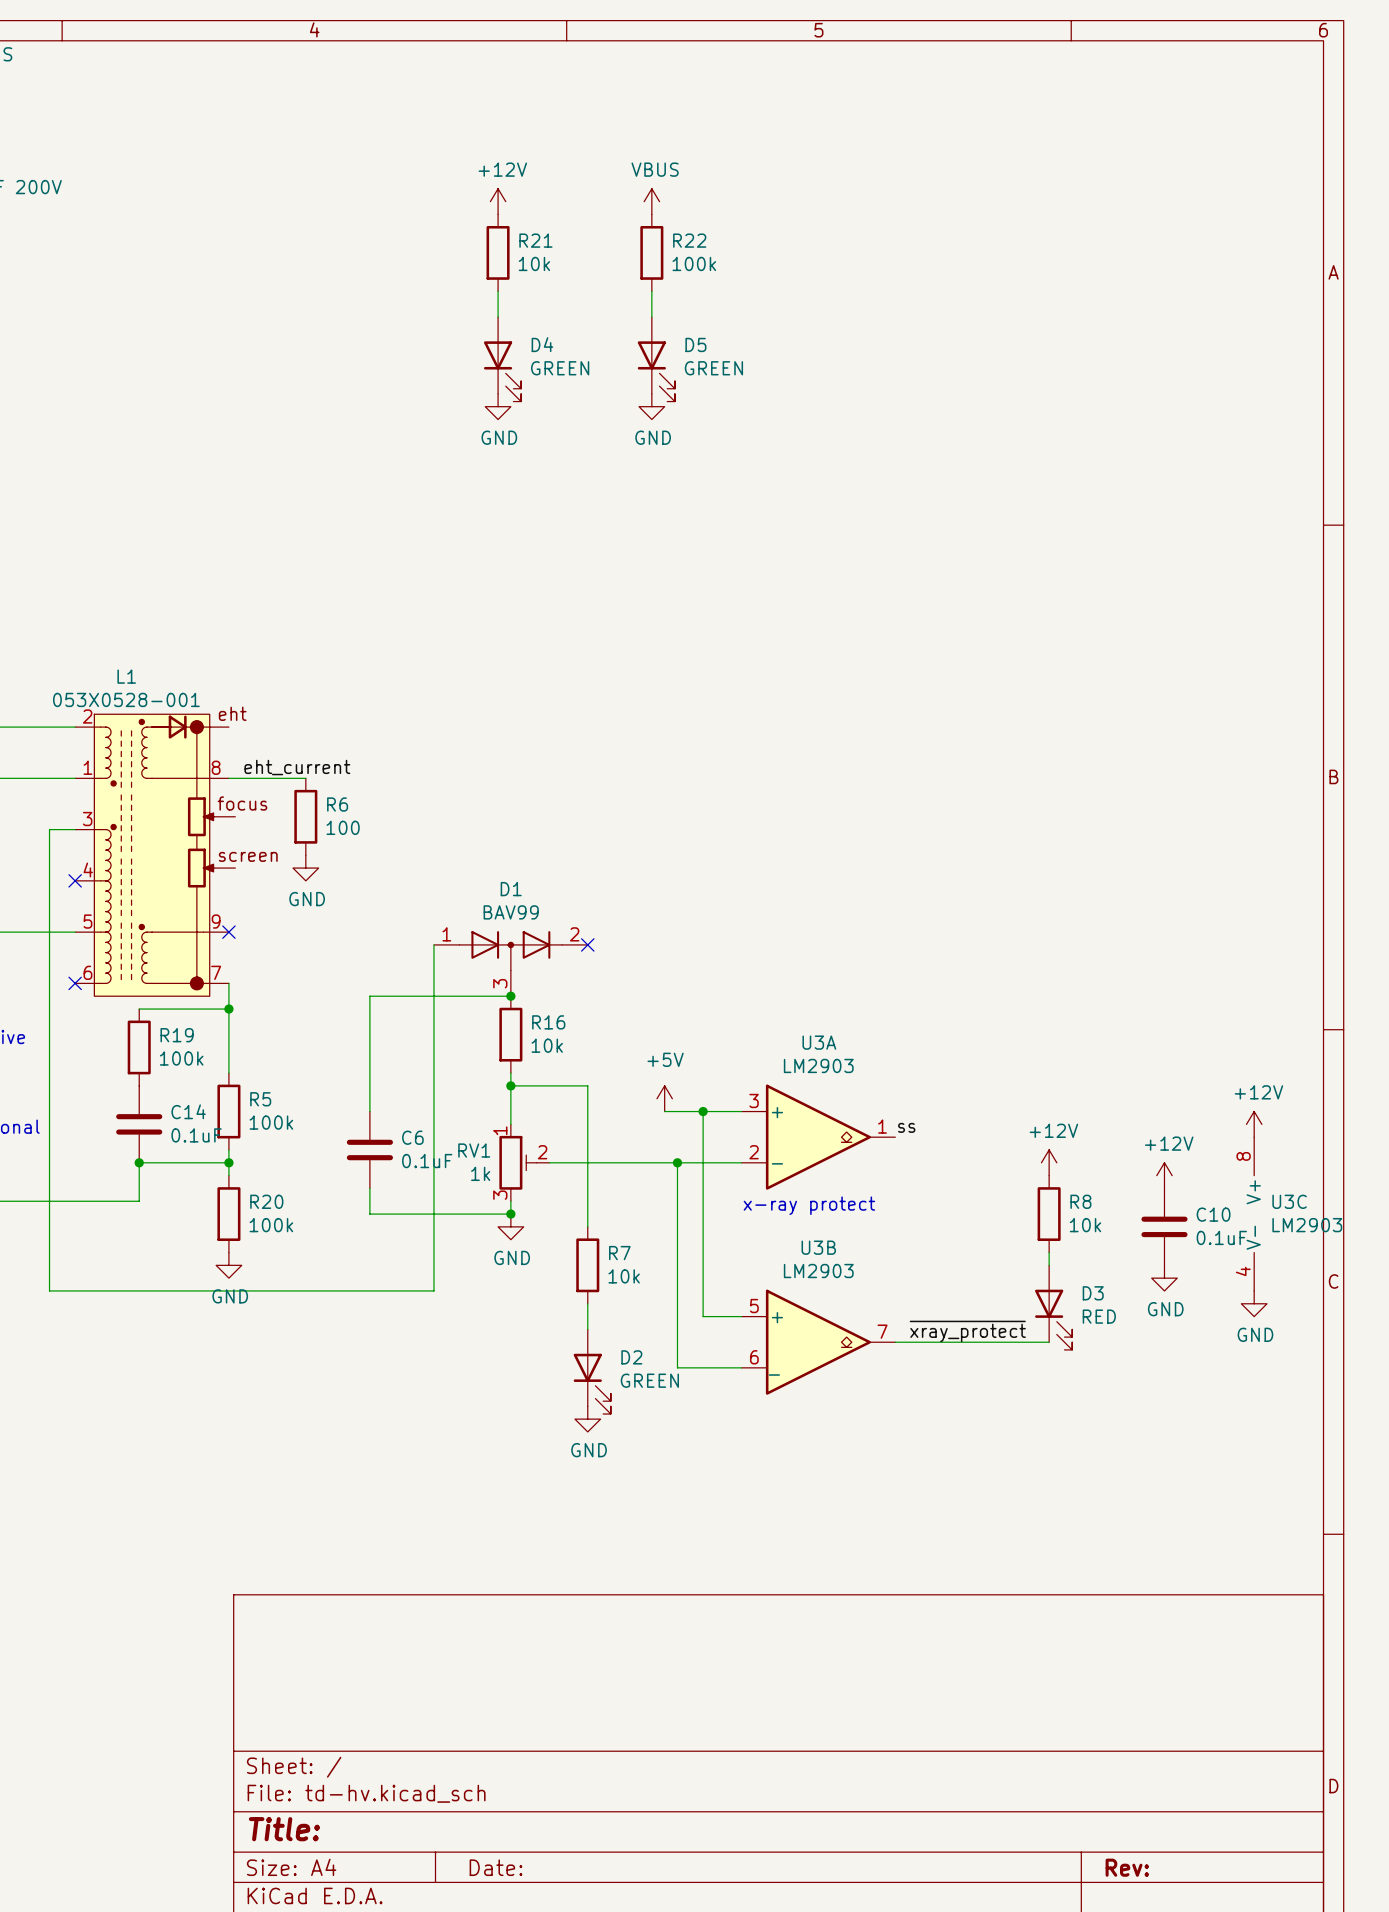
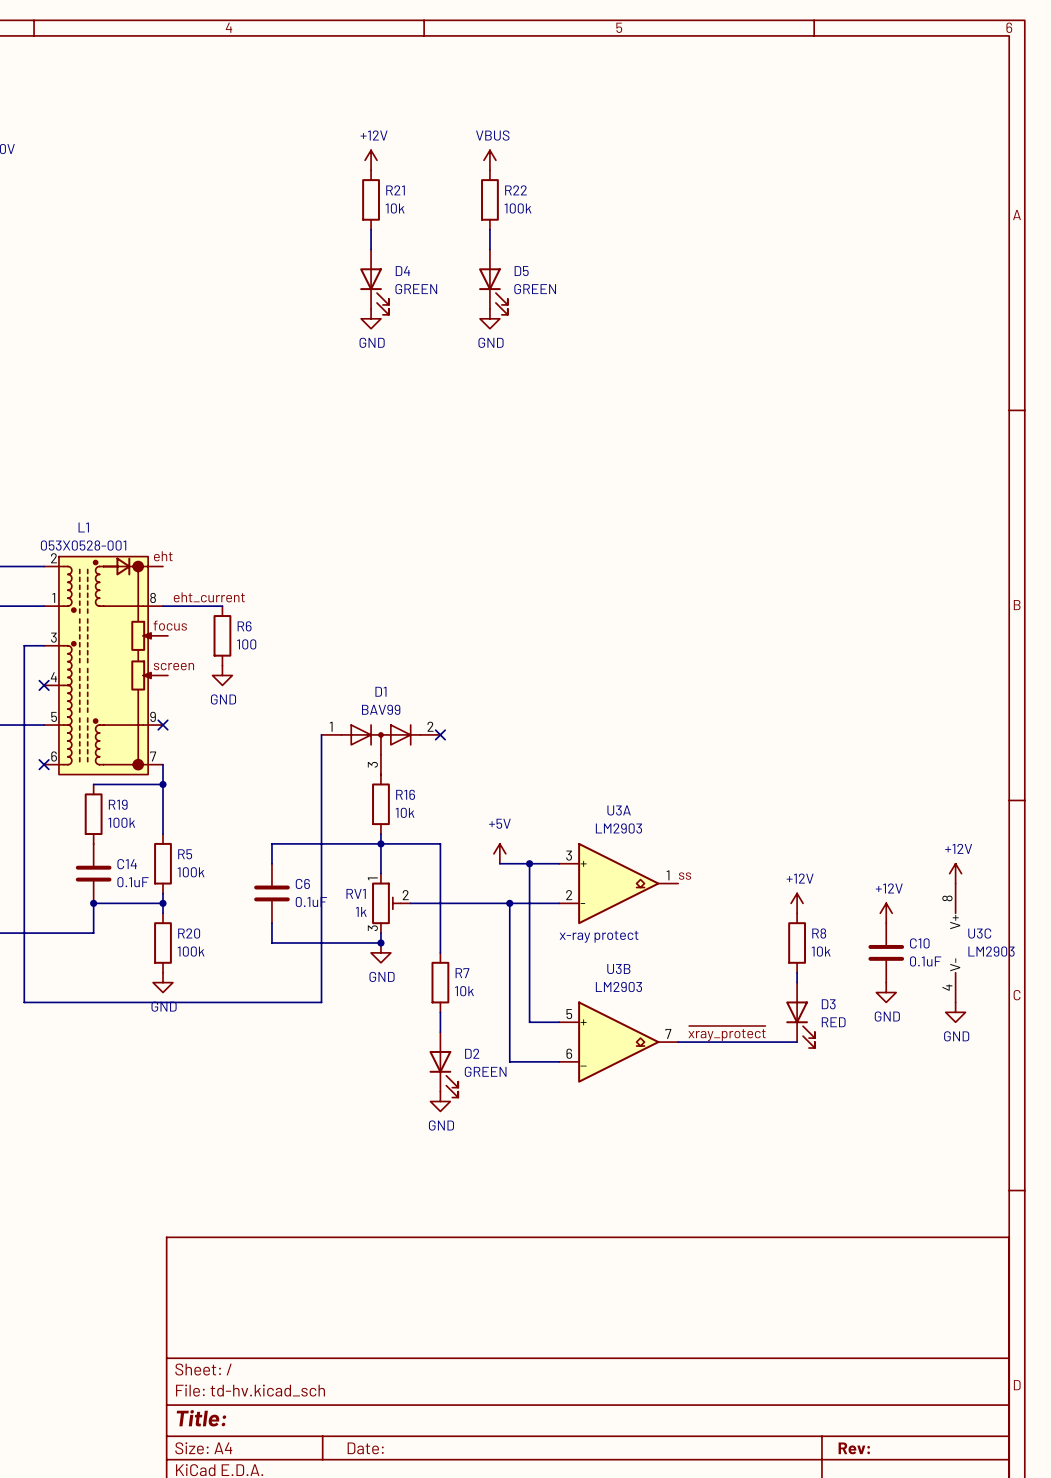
wire: (510, 996) (369, 996) (369, 1085) -> (380, 843) (271, 843)
junction: (510, 996) -> none

